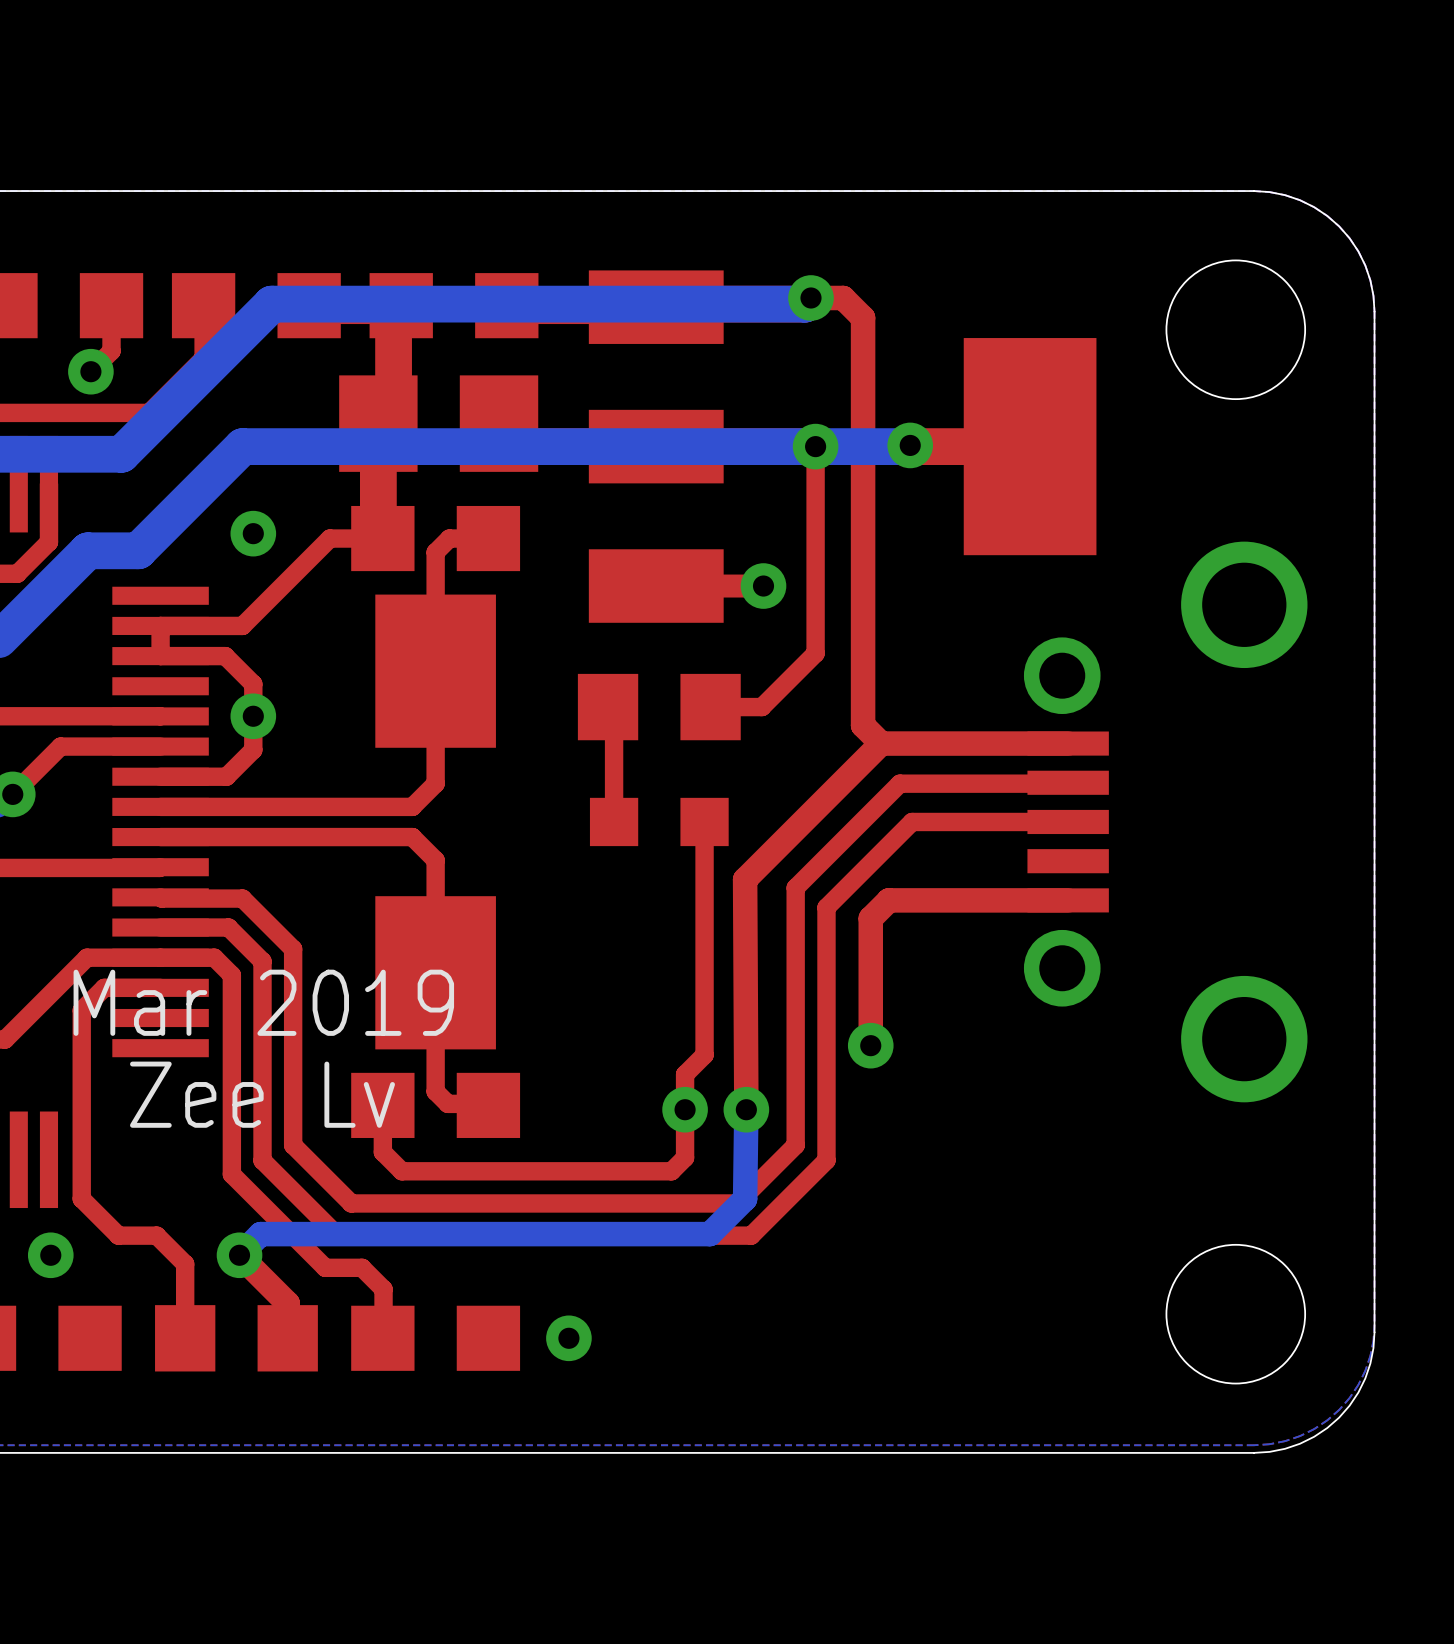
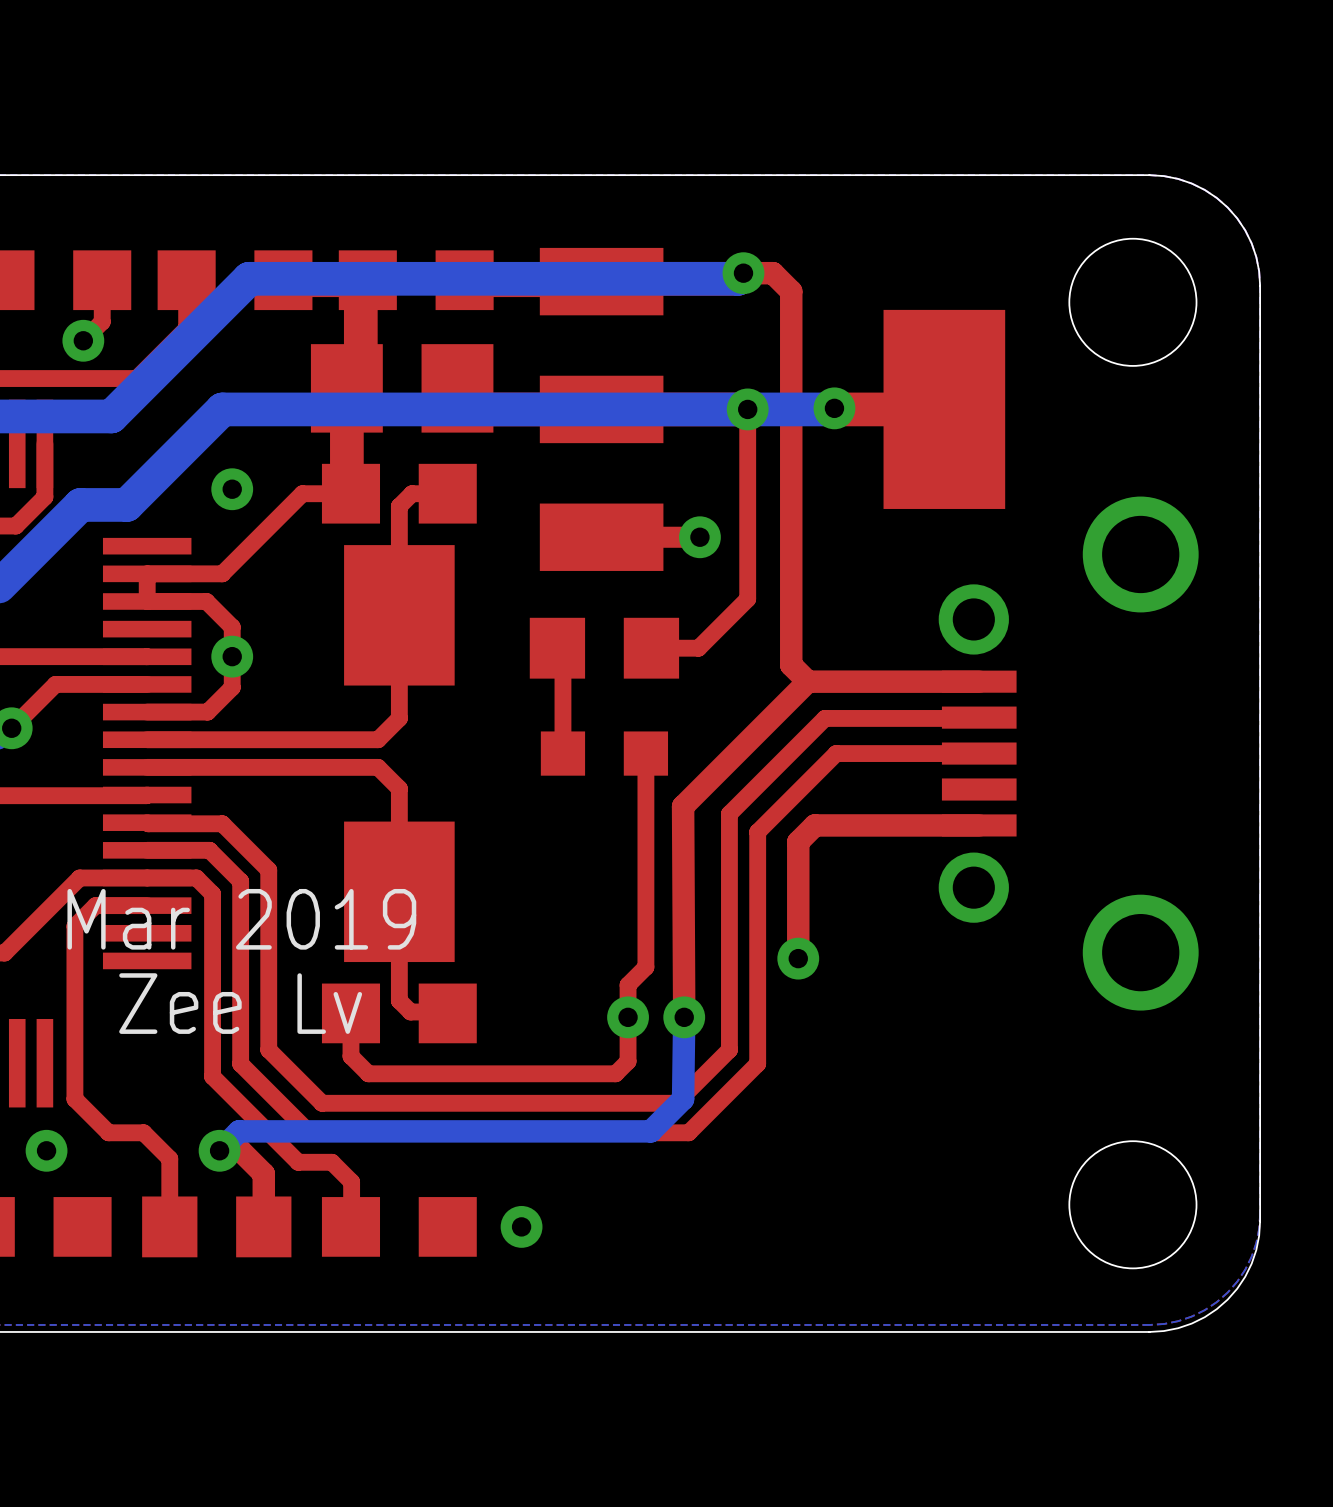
top track: (239, 1255) (287, 1303) -> (219, 1150) (240, 1150) (263, 1173) (263, 1194)

